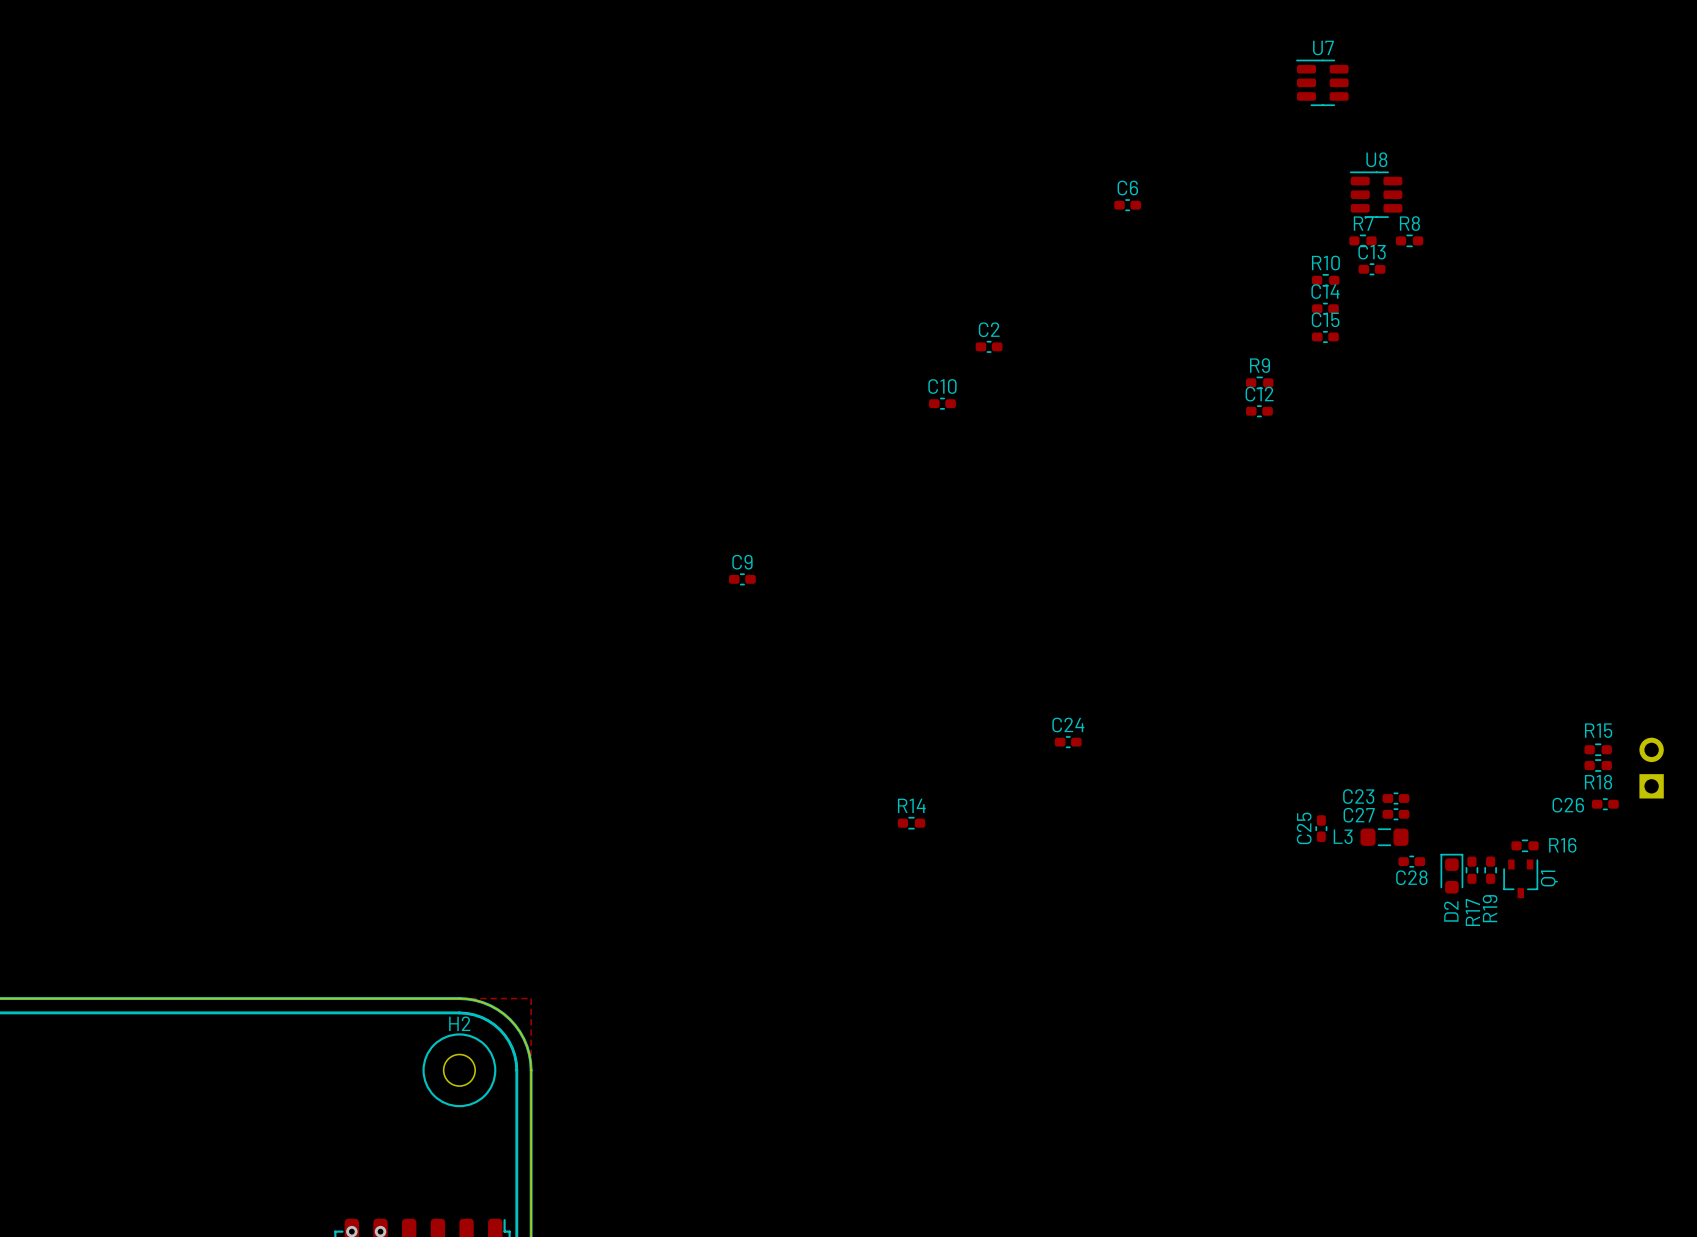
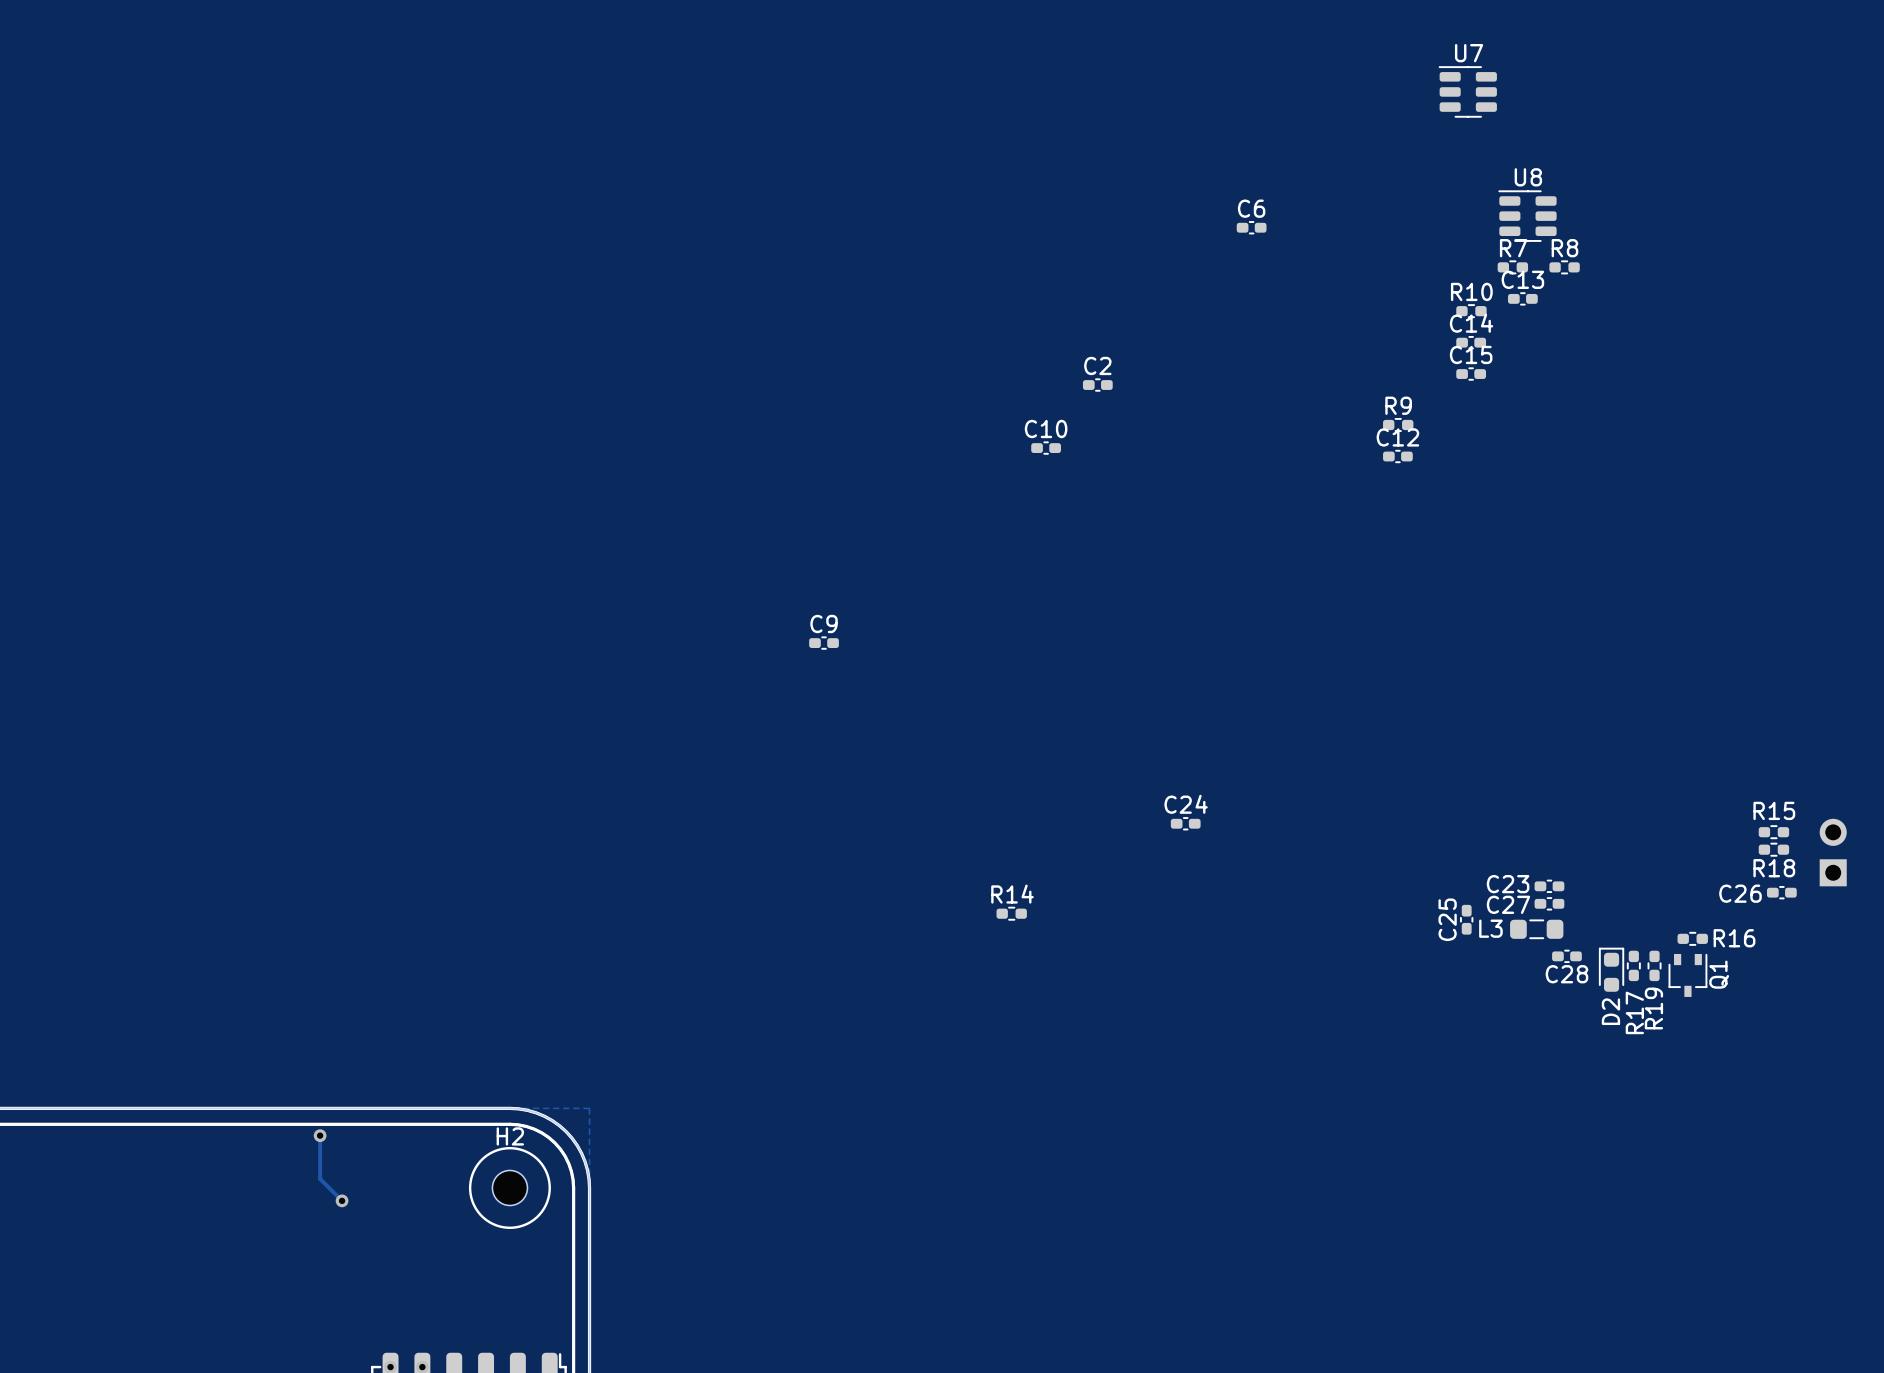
track: none -> (320, 1135) (320, 1178) (342, 1200)
via: none -> (320, 1135)
via: none -> (342, 1200)

